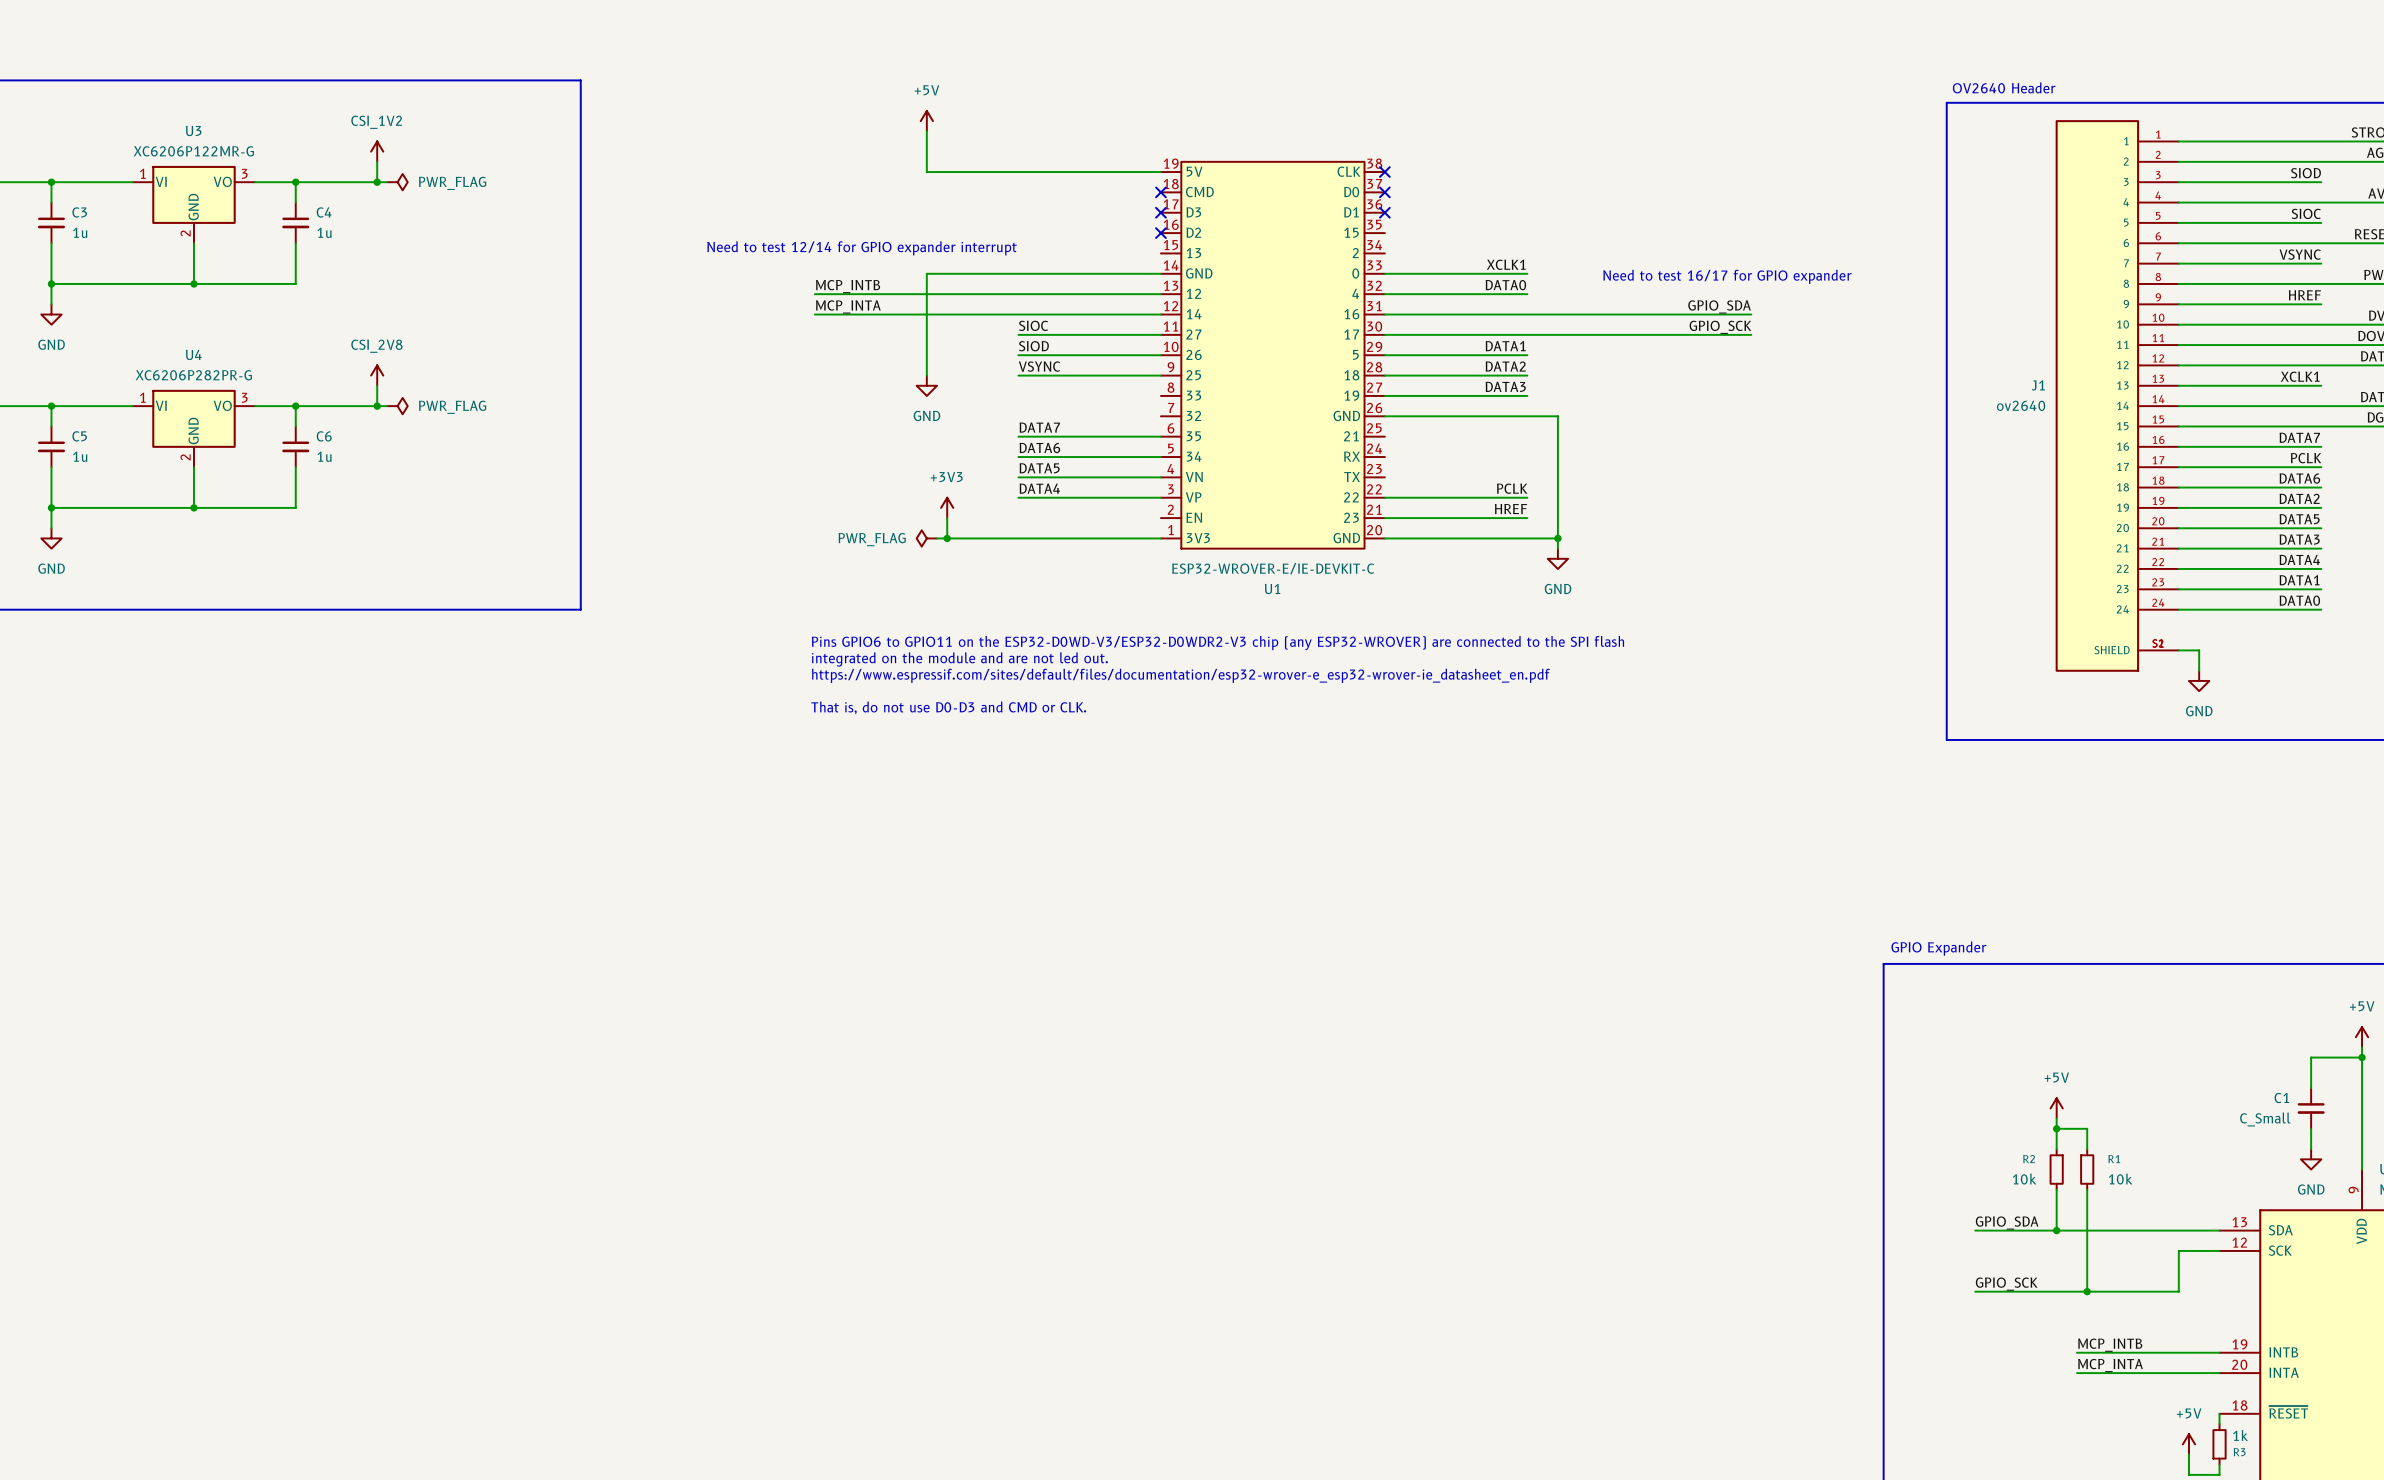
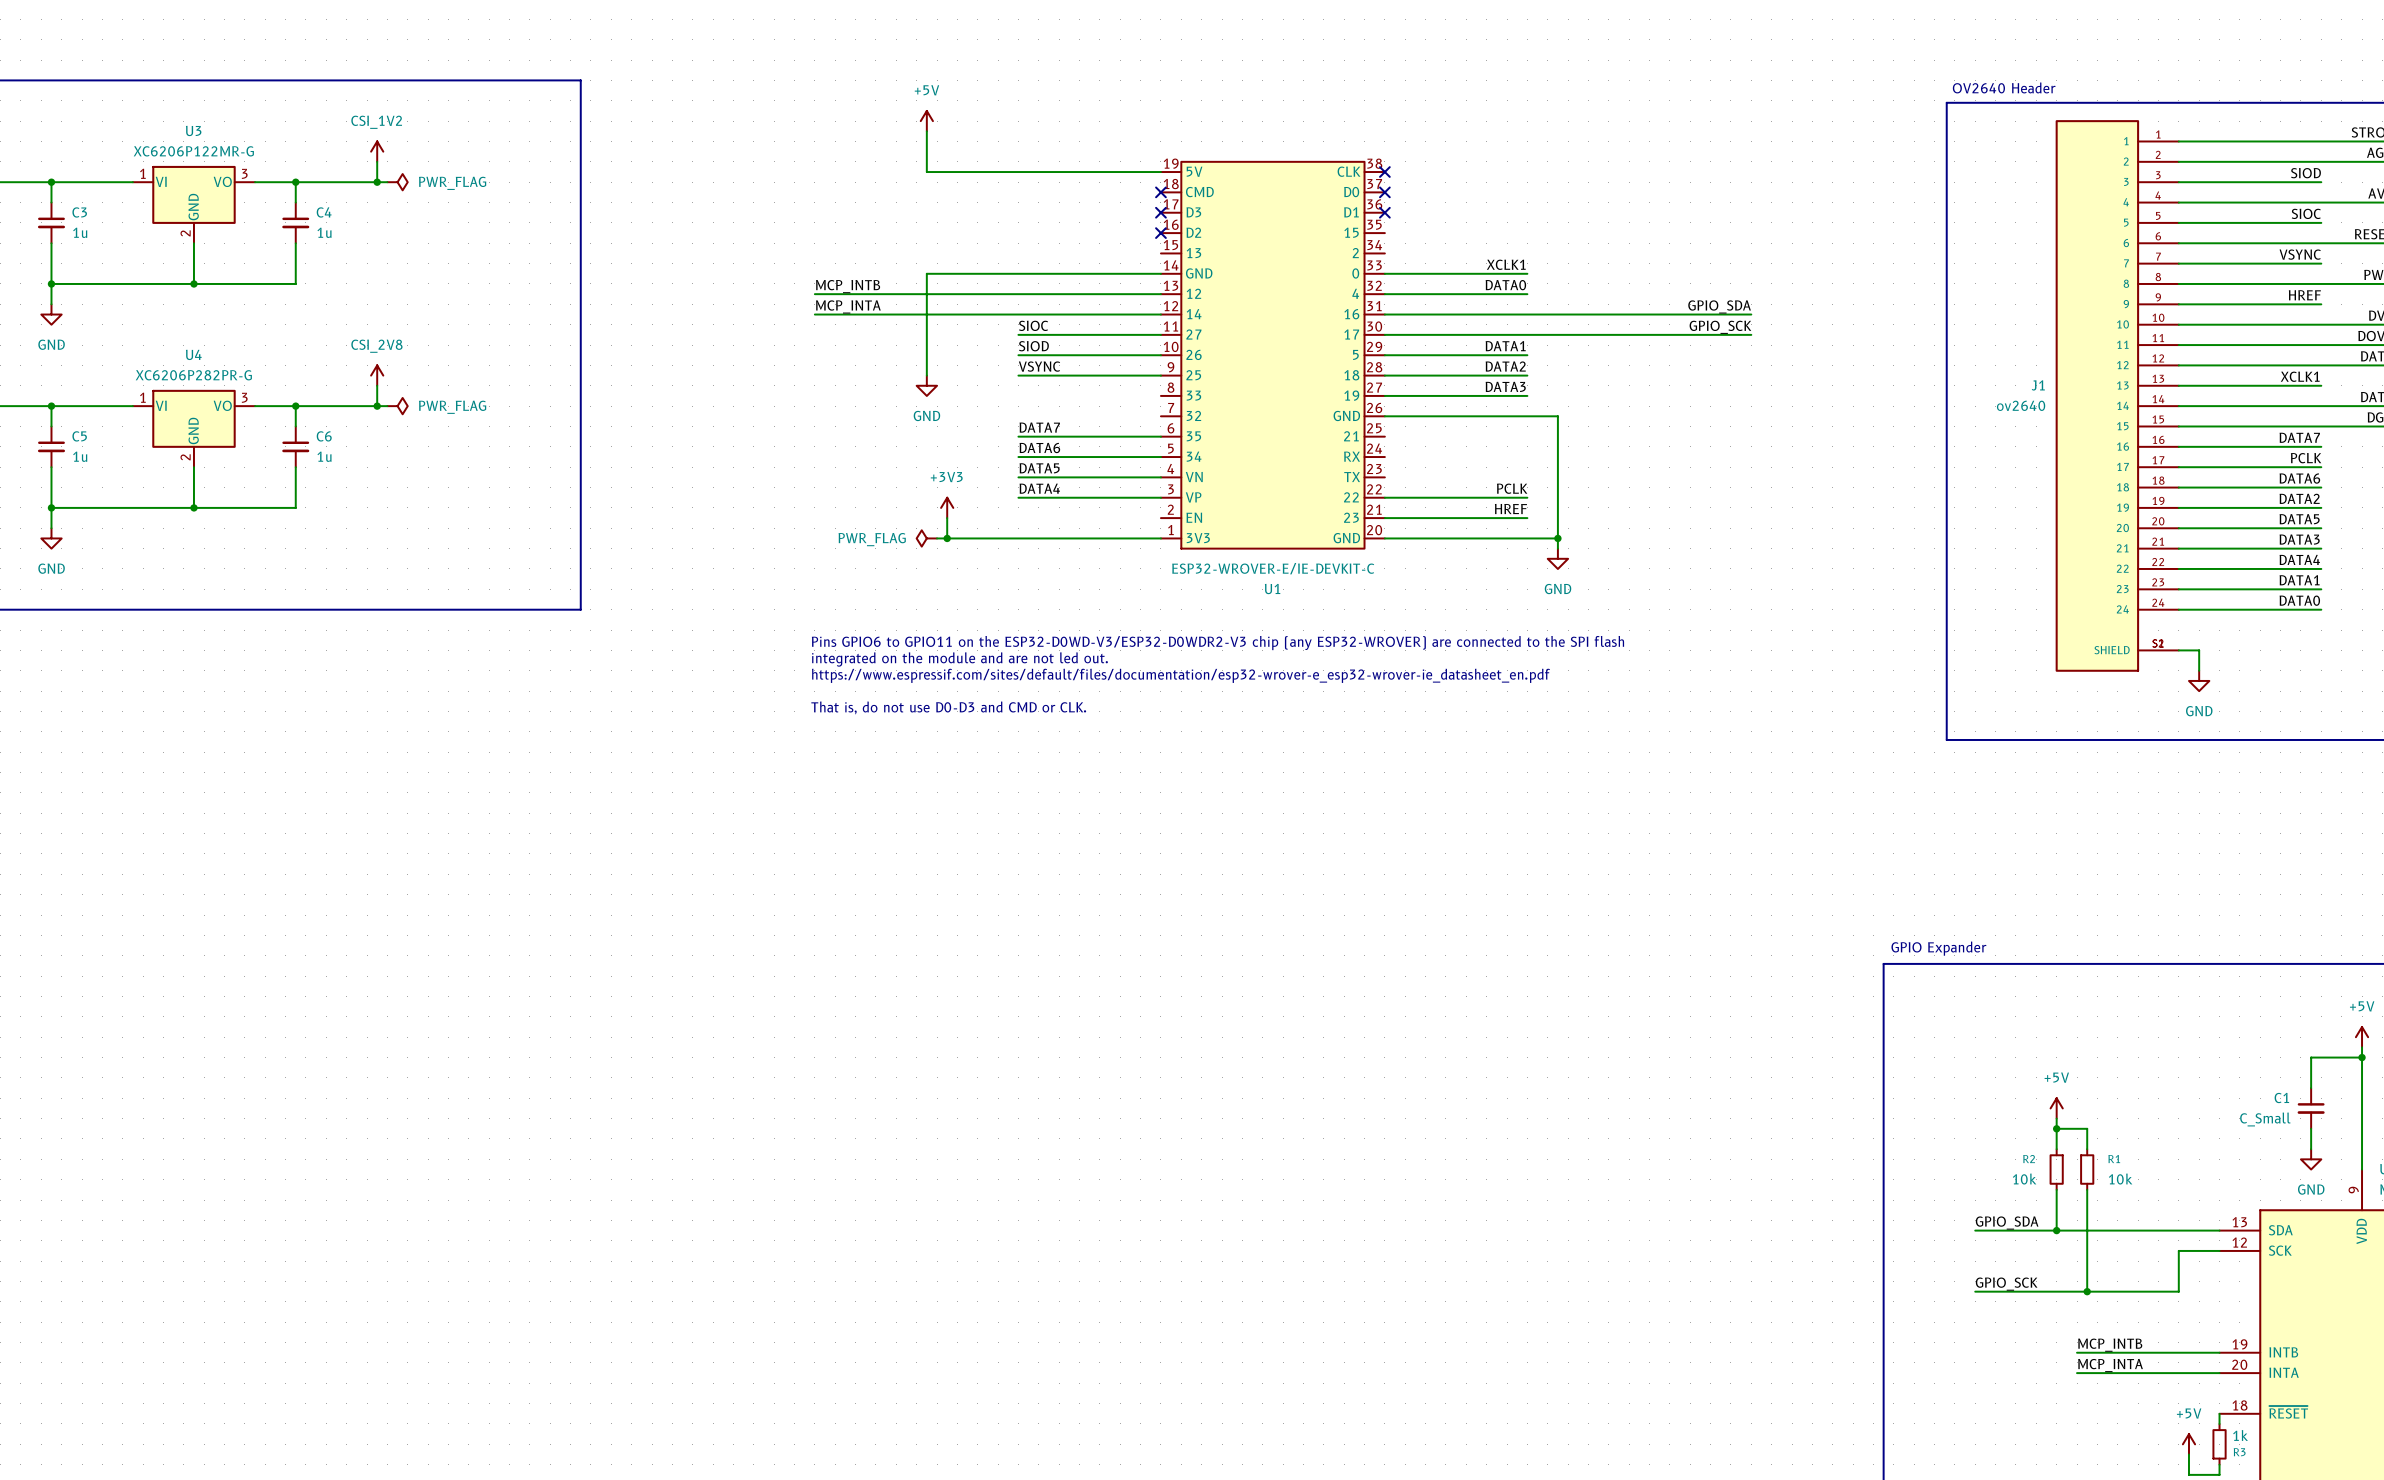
text: Need to test 12/14 for GPIO expander interrupt (862, 248) -> none
text: Need to test 16/17 for GPIO expander (1727, 276) -> none

